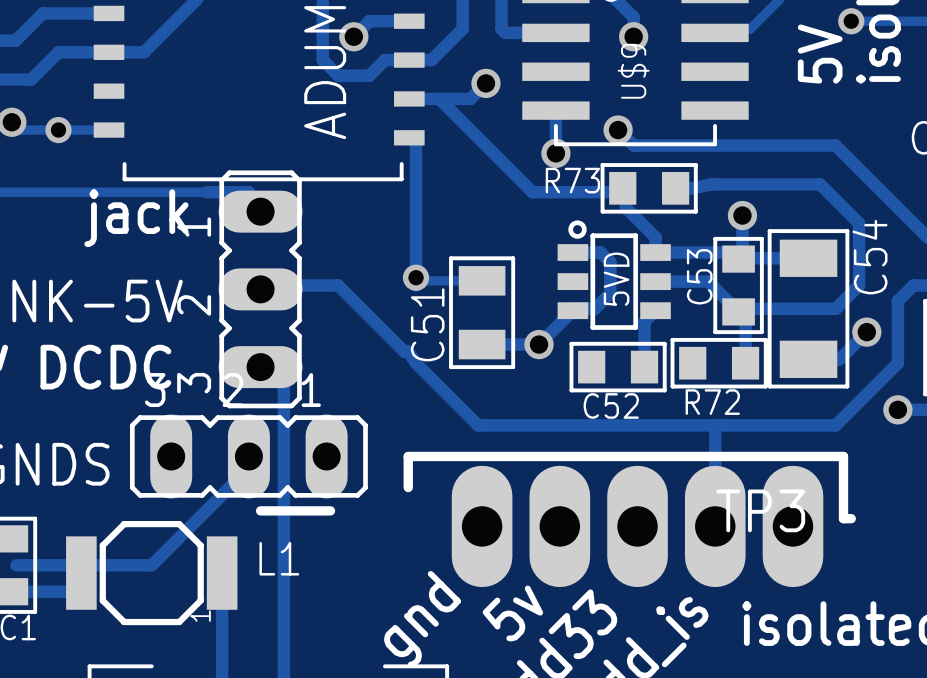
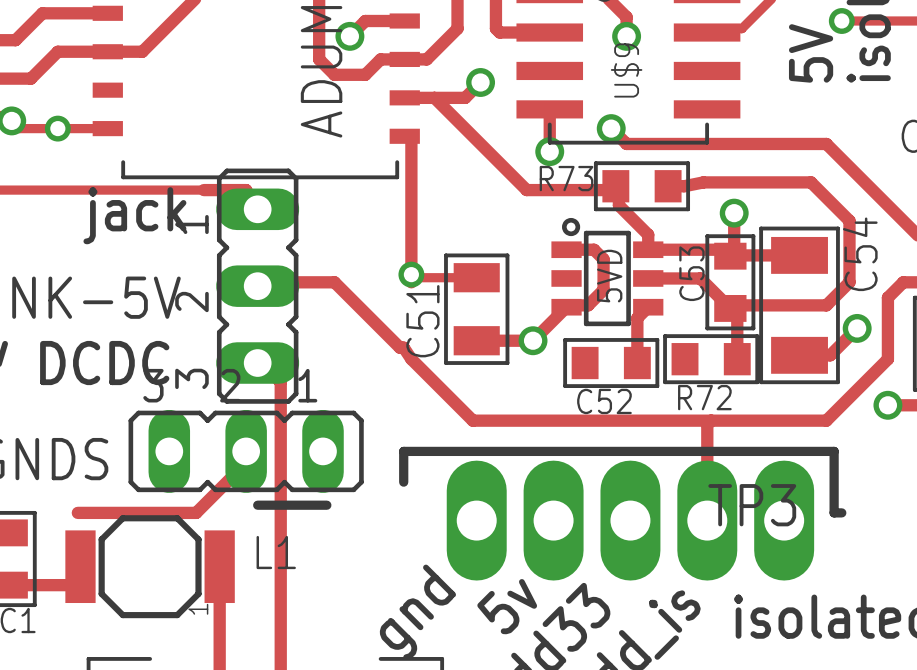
track: (198, 518) (151, 565) (16, 565) -> (196, 512) (77, 512)

